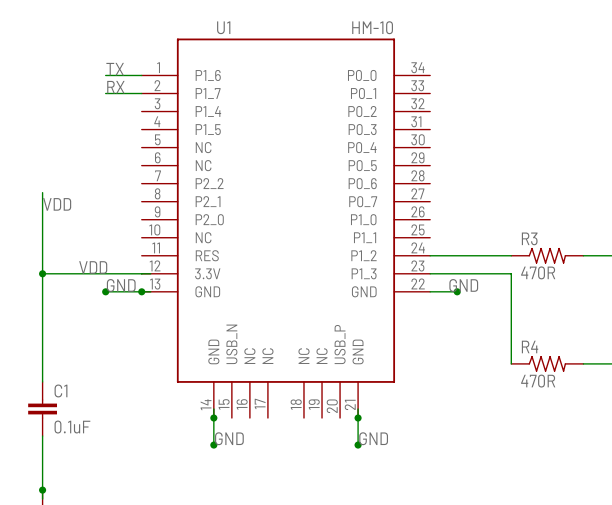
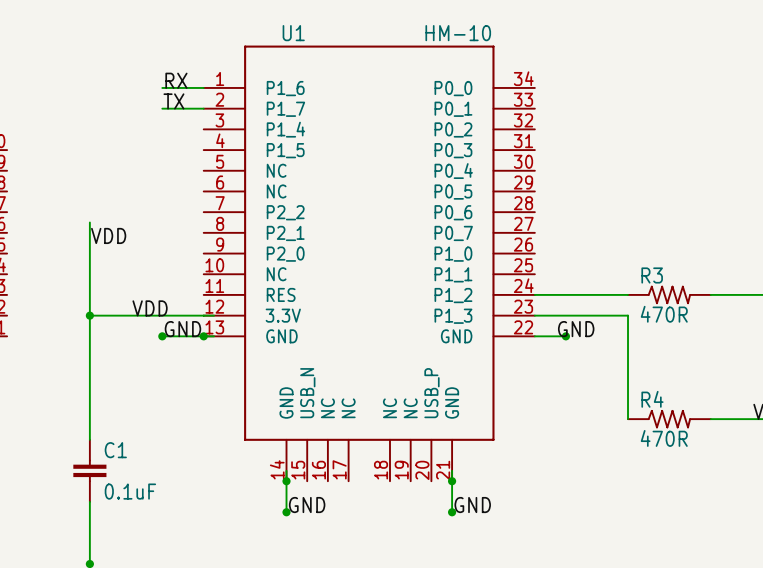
label: TX (115, 69) -> RX (176, 80)
label: RX (115, 87) -> TX (173, 101)

